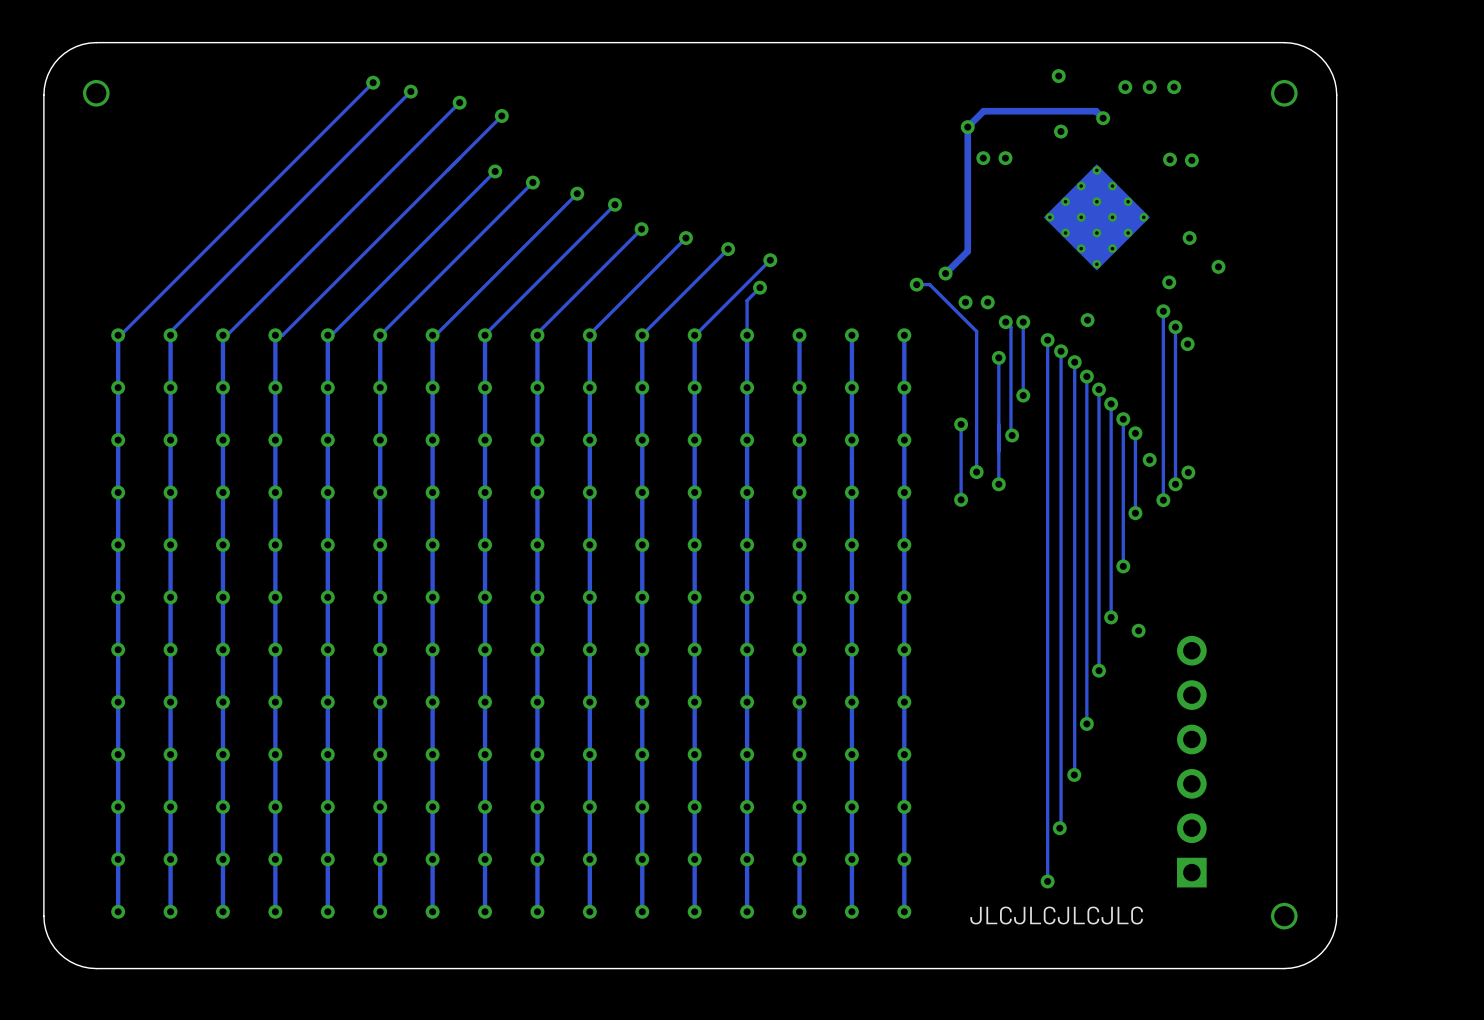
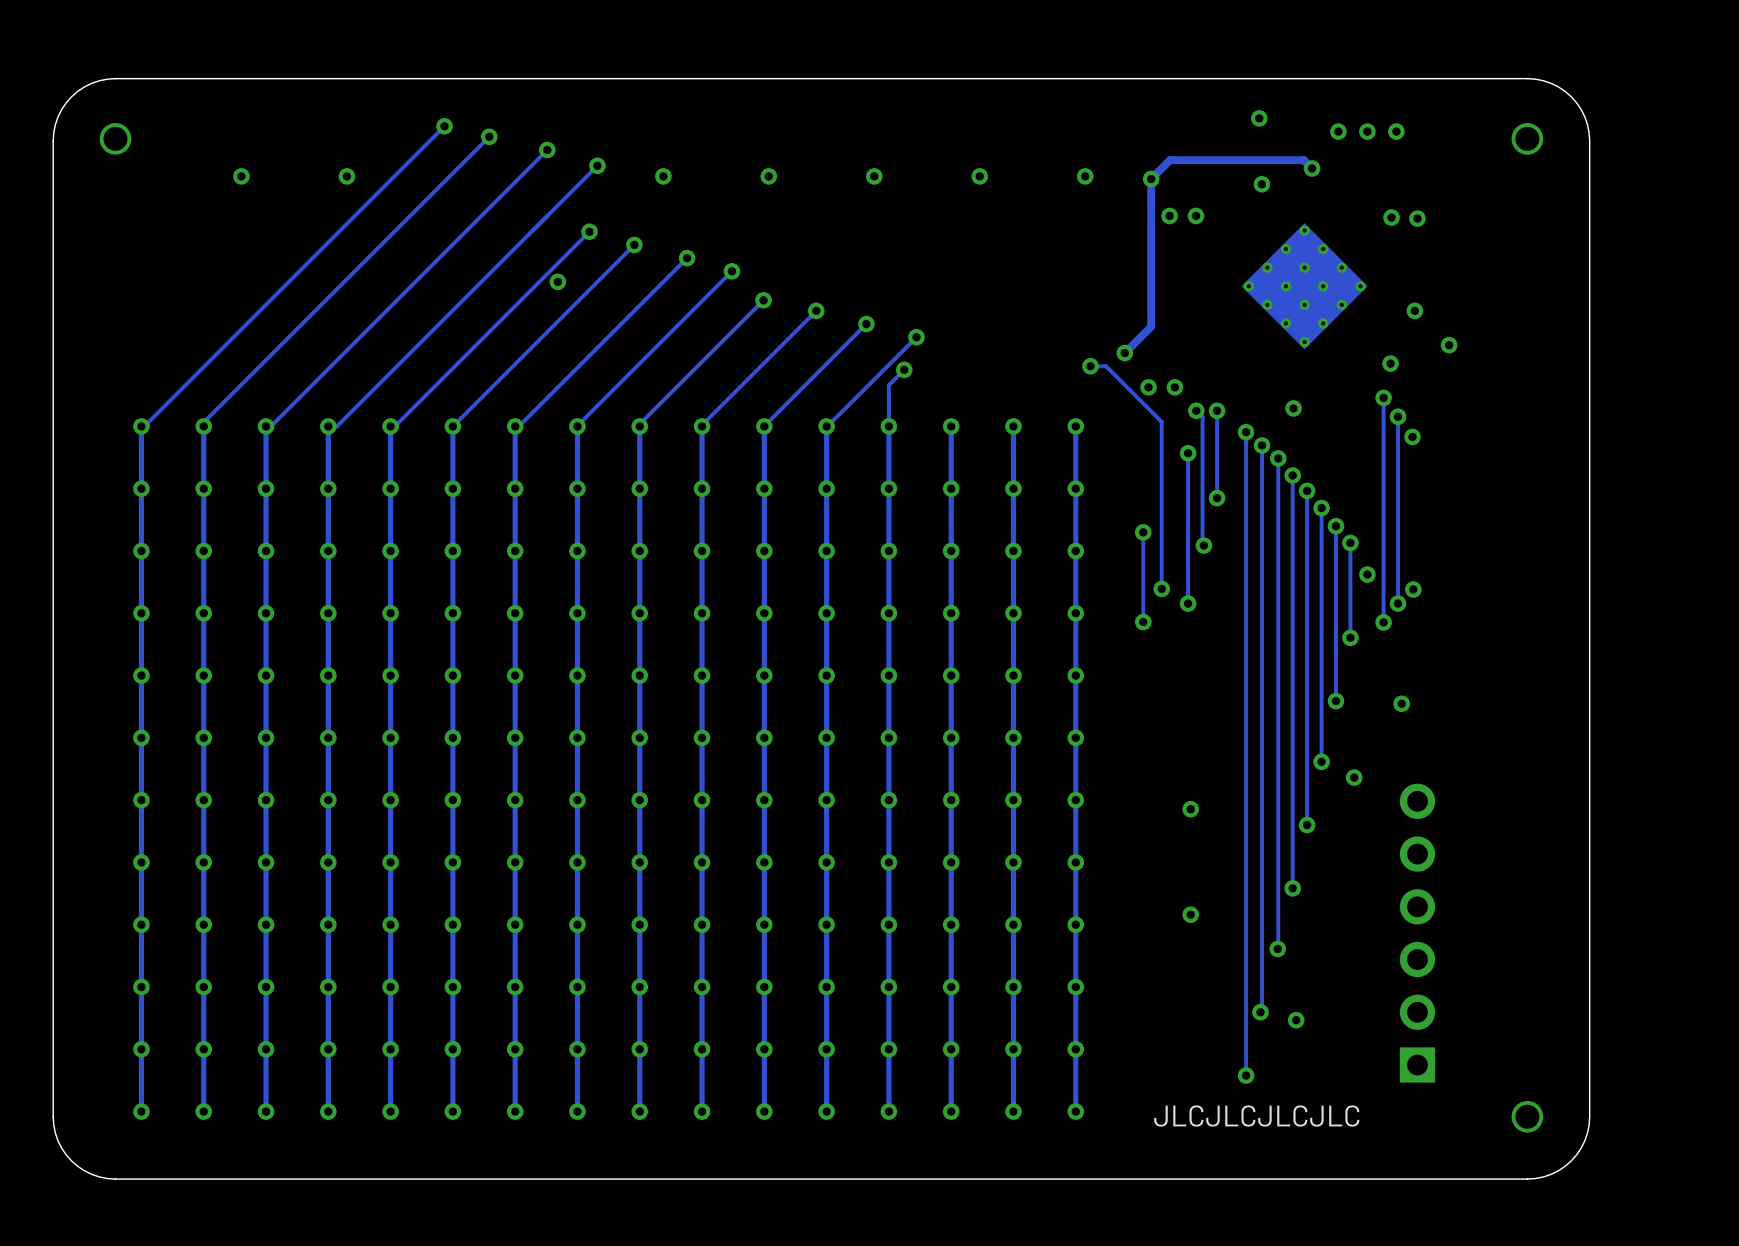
via: none -> (241, 176)
via: none -> (346, 176)
via: none -> (663, 176)
via: none -> (768, 176)
via: none -> (874, 176)
via: none -> (979, 176)
via: none -> (1085, 176)
via: none -> (557, 281)
via: none -> (1401, 703)
via: none -> (1190, 809)
via: none -> (1190, 914)
via: none -> (1296, 1020)

